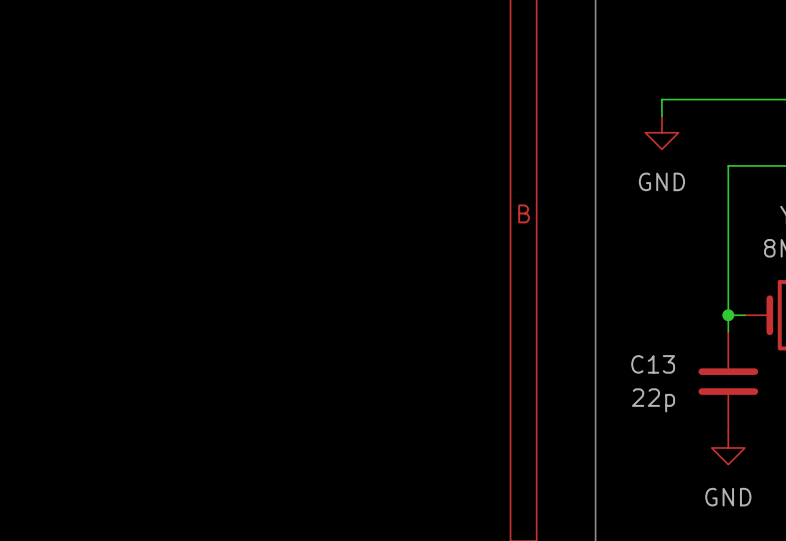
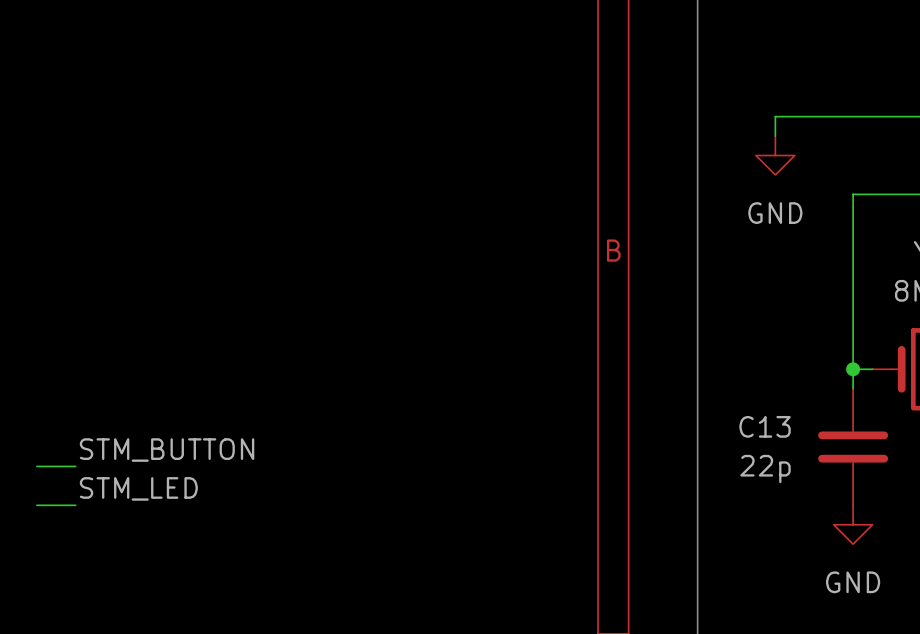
label: none -> STM_BUTTON (167, 450)
wire: none -> (36, 466) (75, 466)
label: none -> STM_LED (138, 488)
wire: none -> (36, 505) (75, 505)

